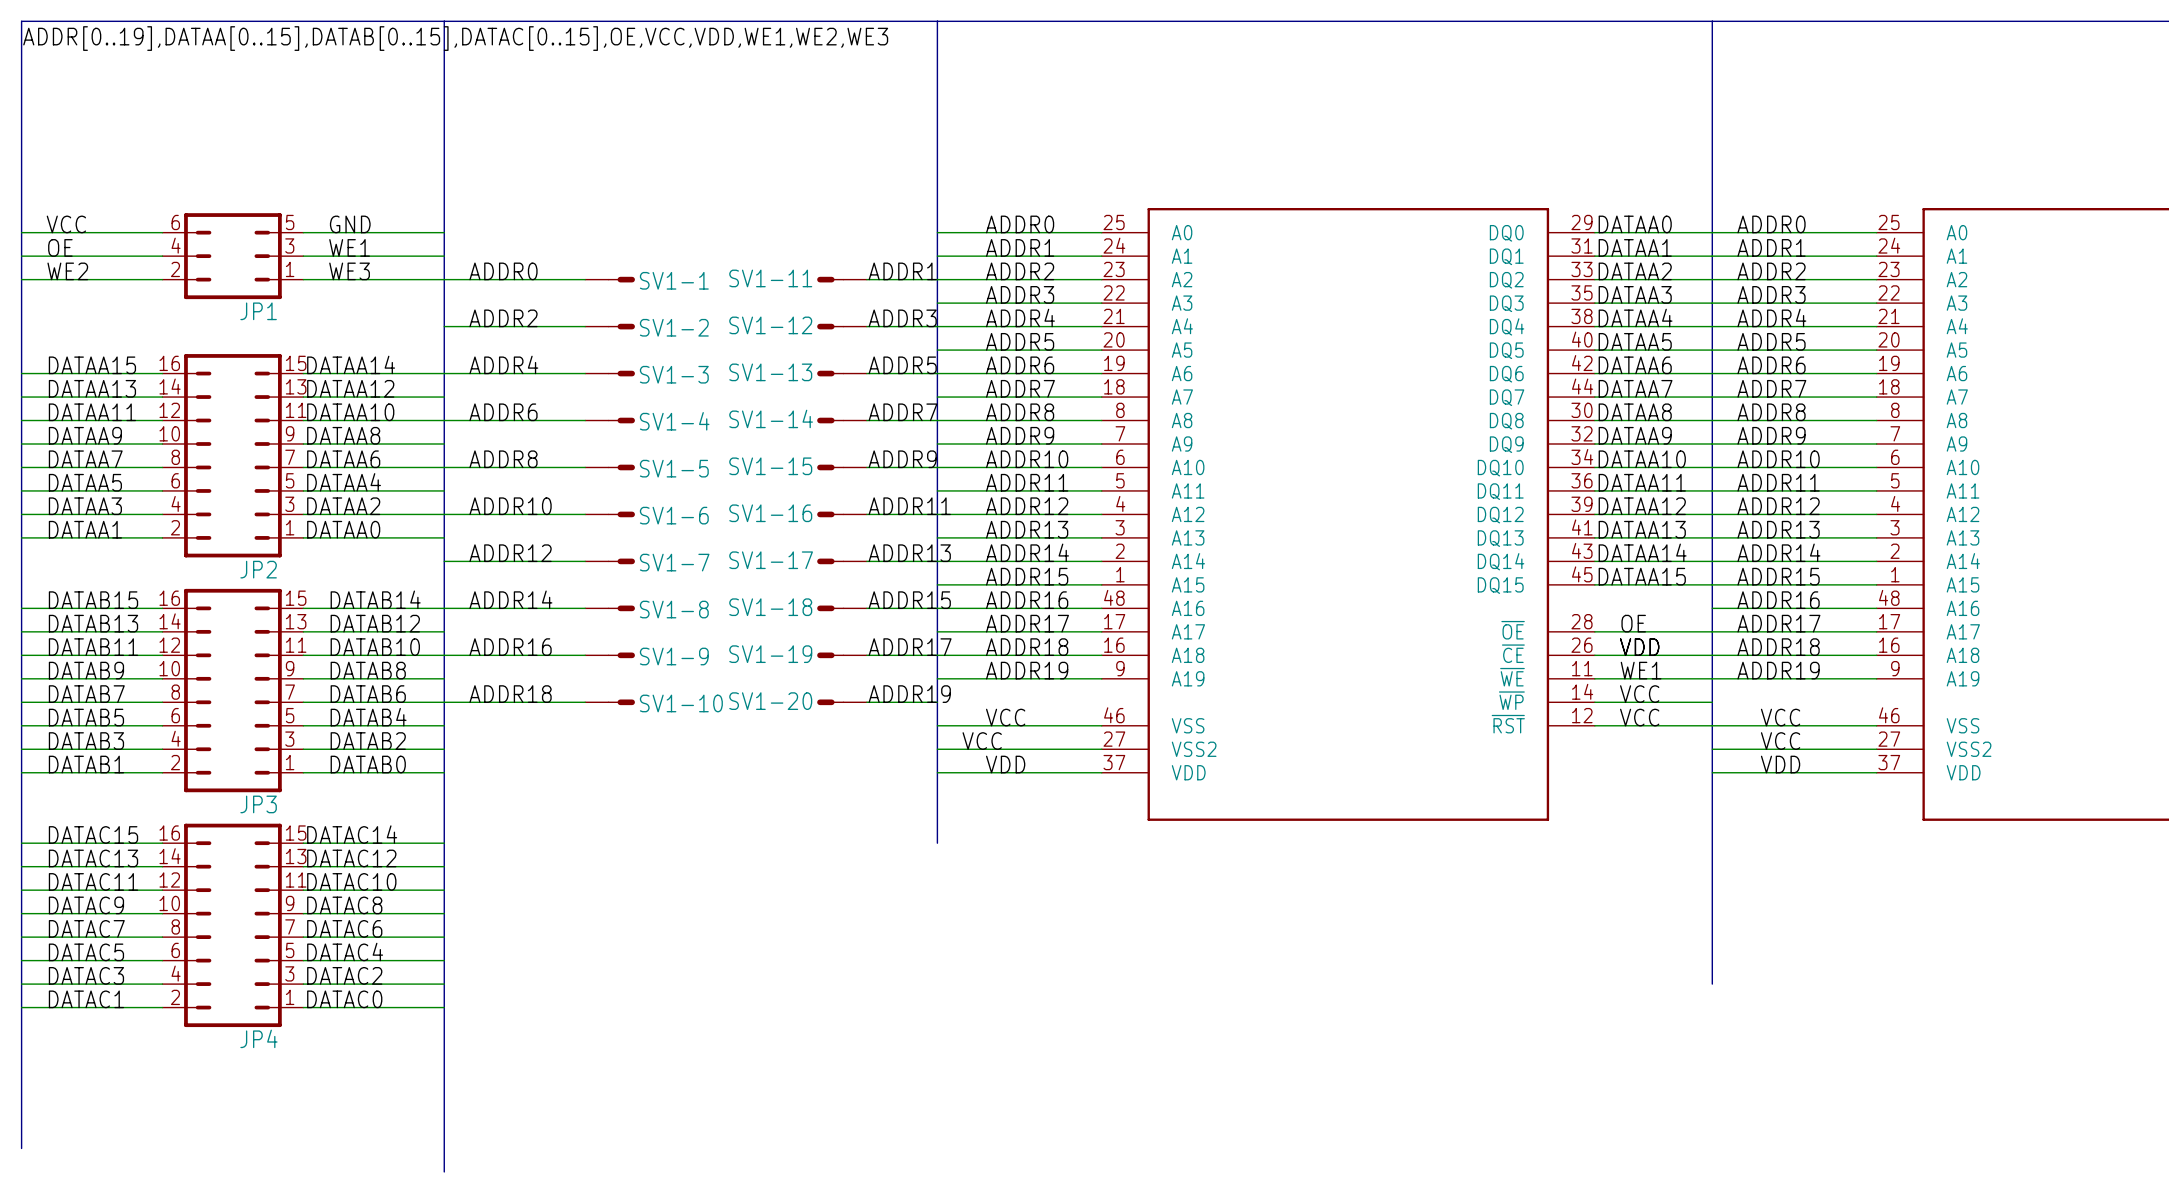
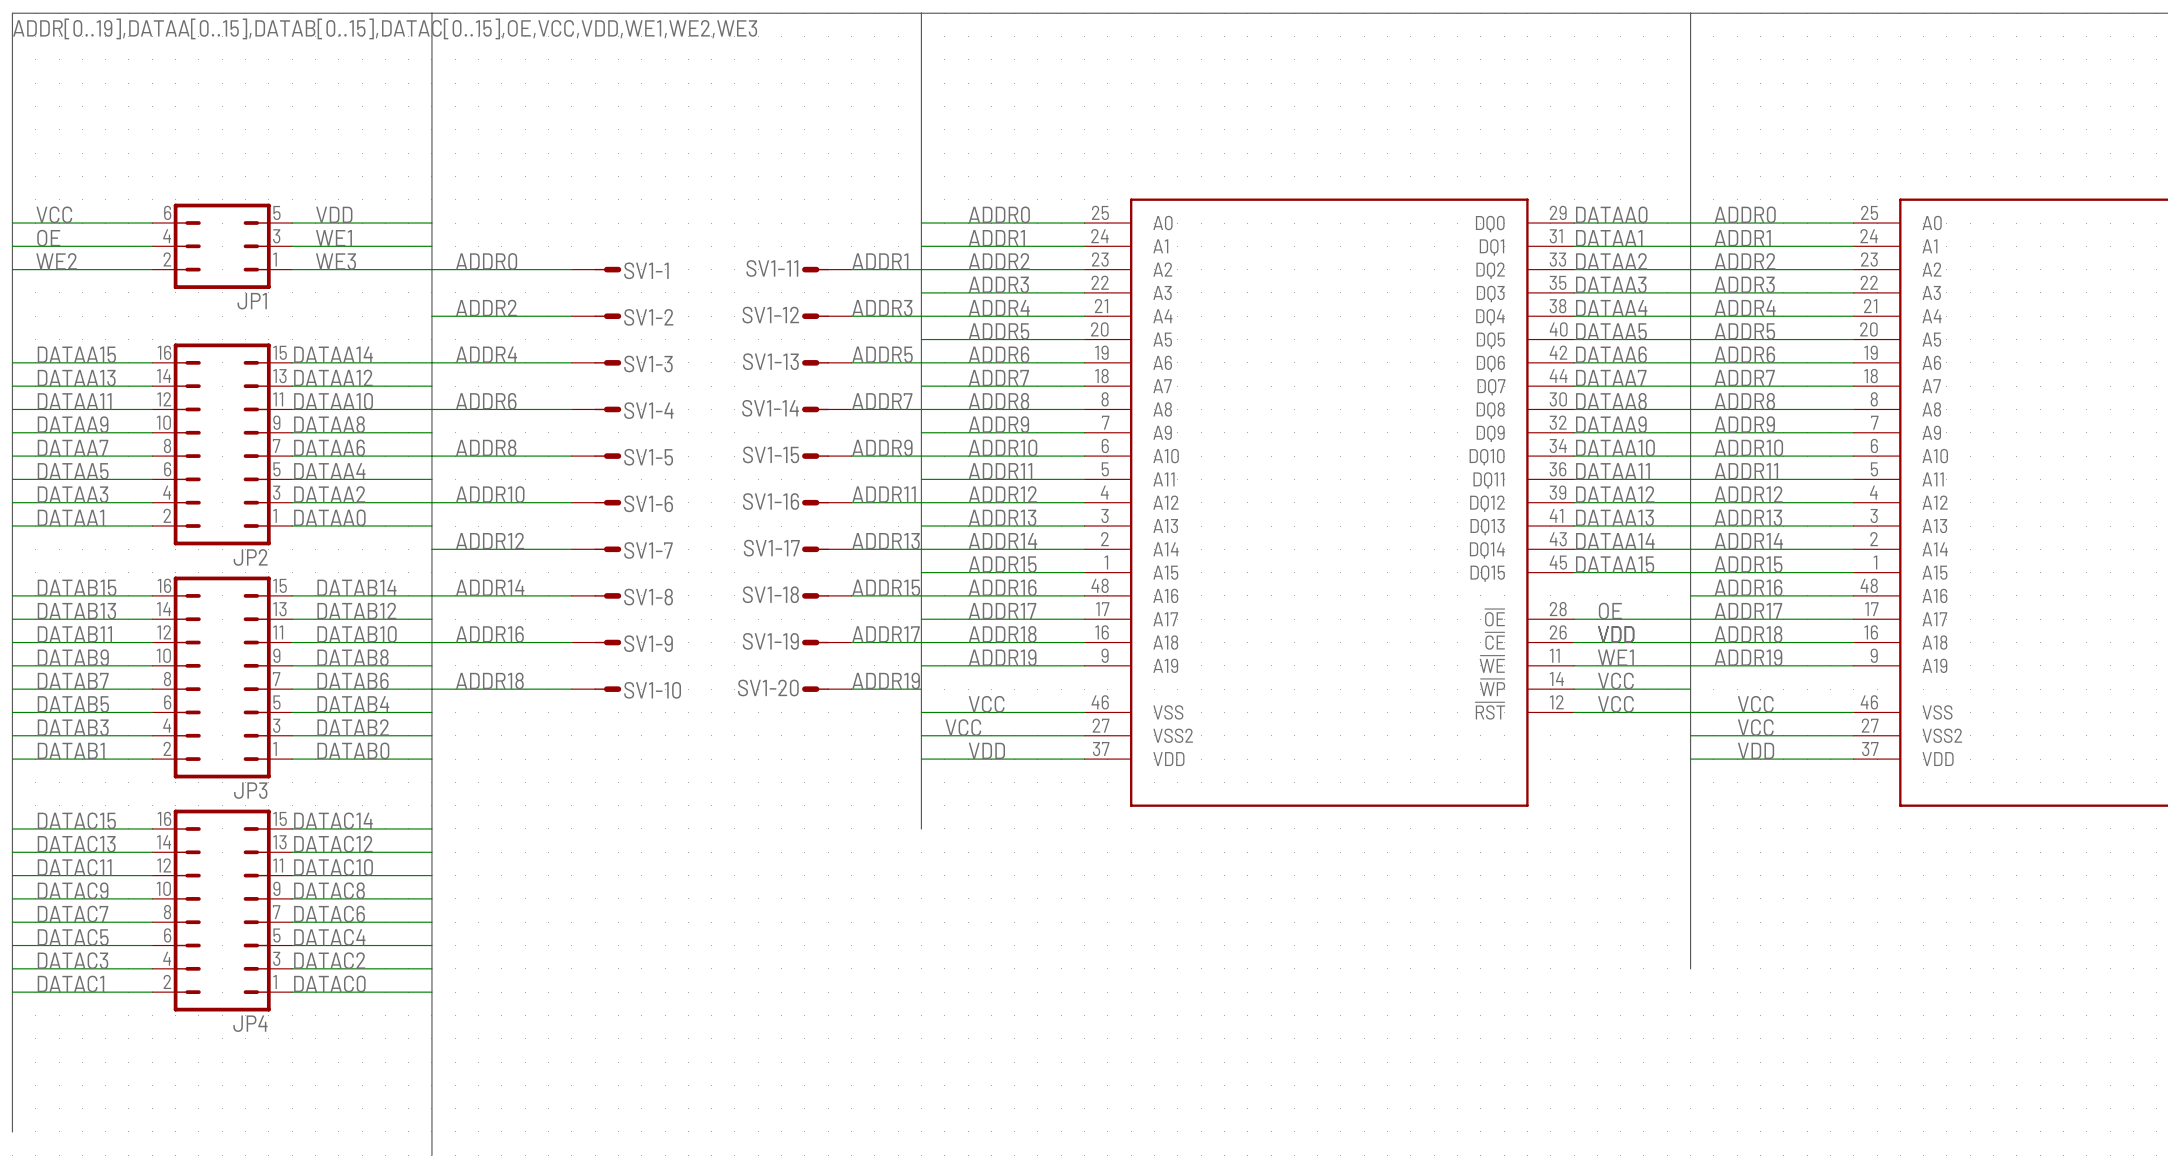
label: GND (350, 224) -> VDD (334, 214)

